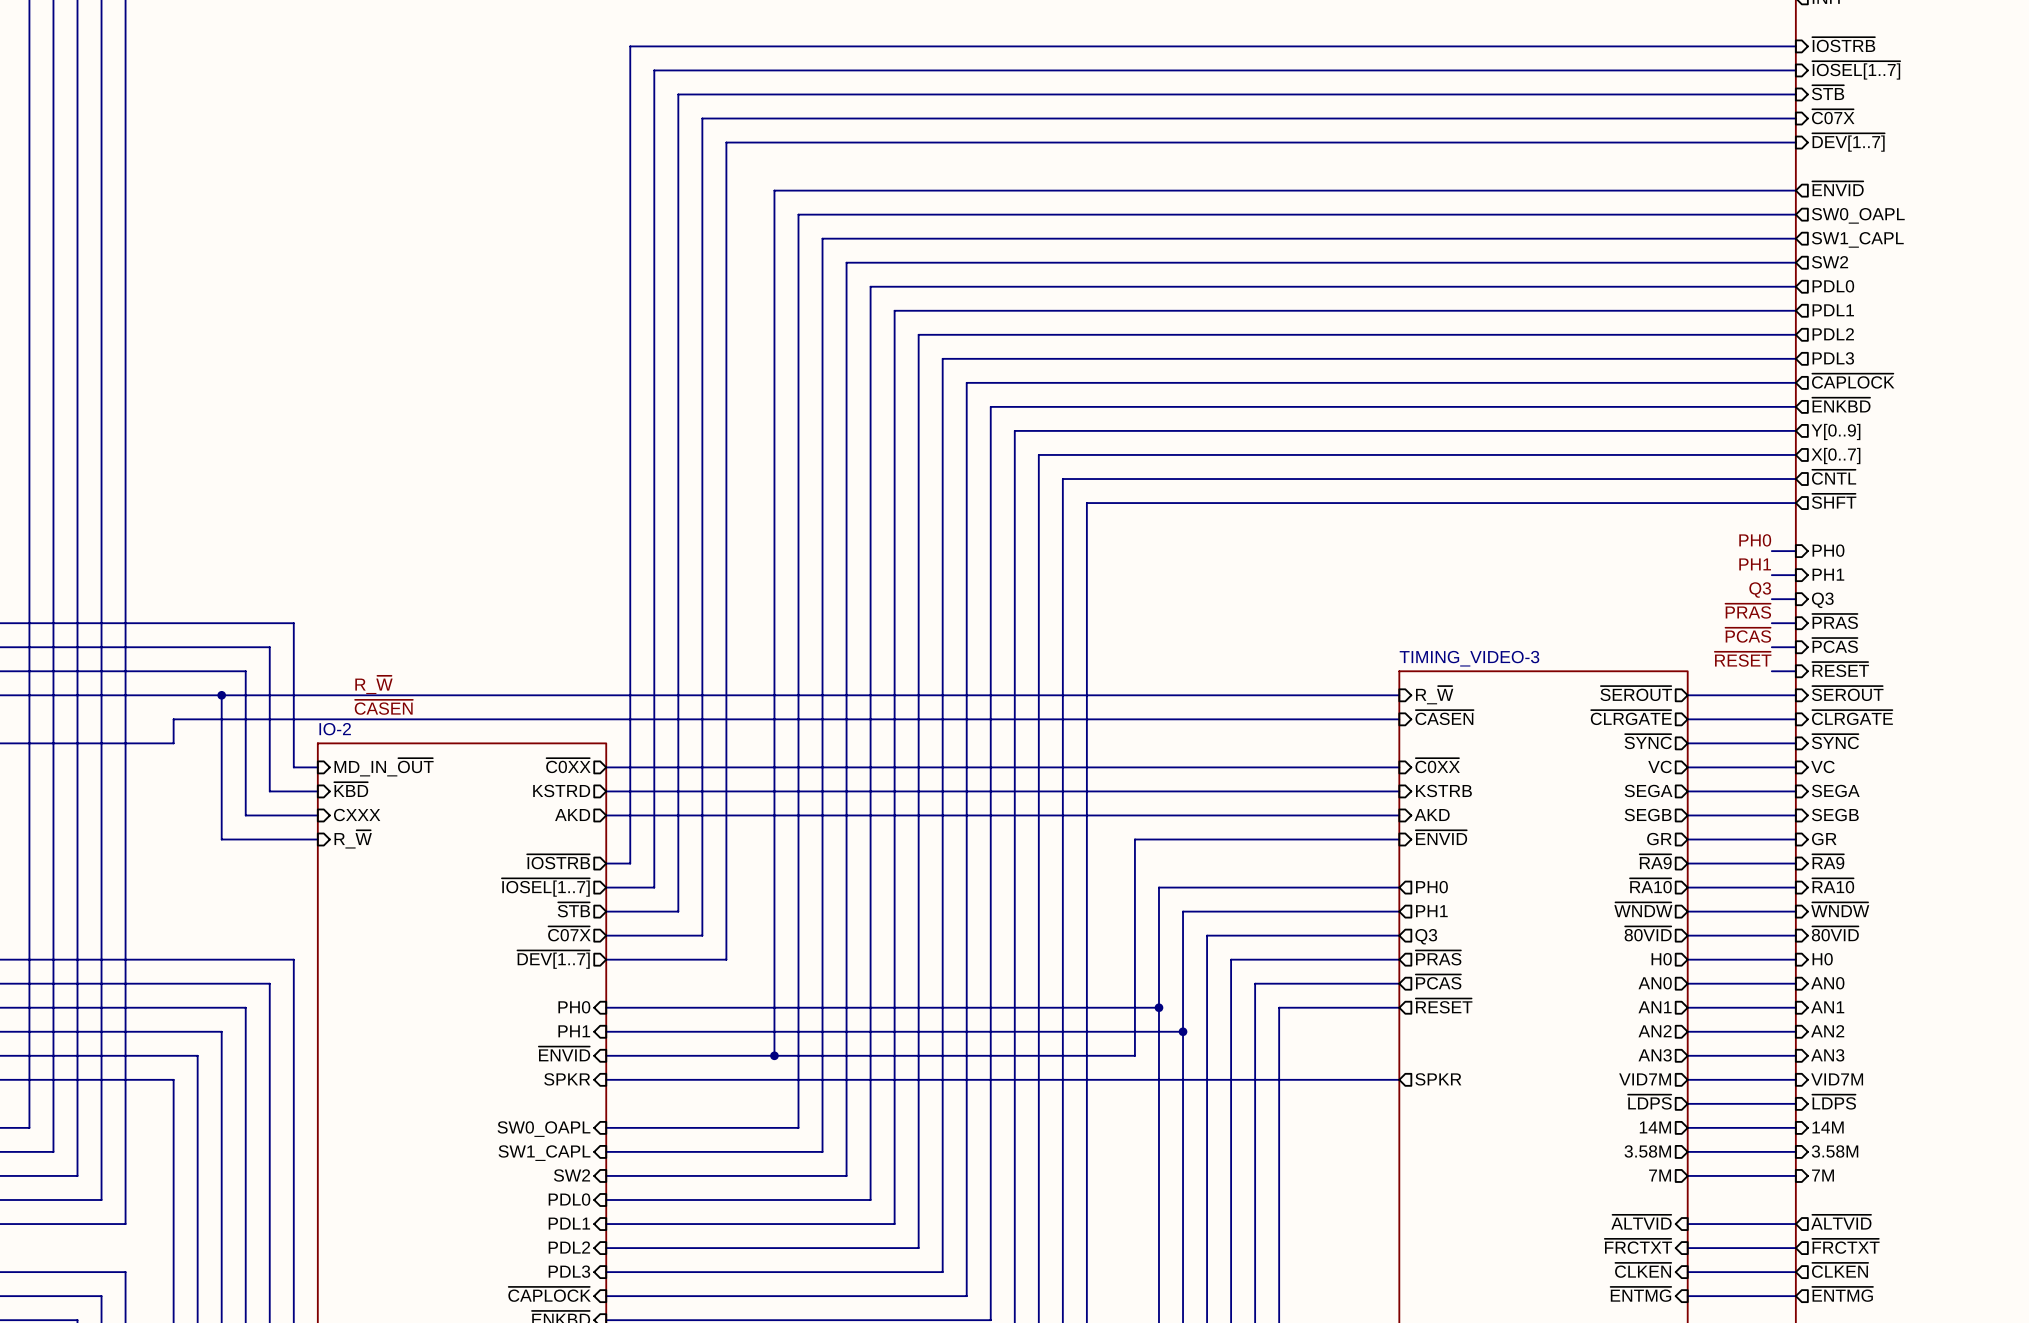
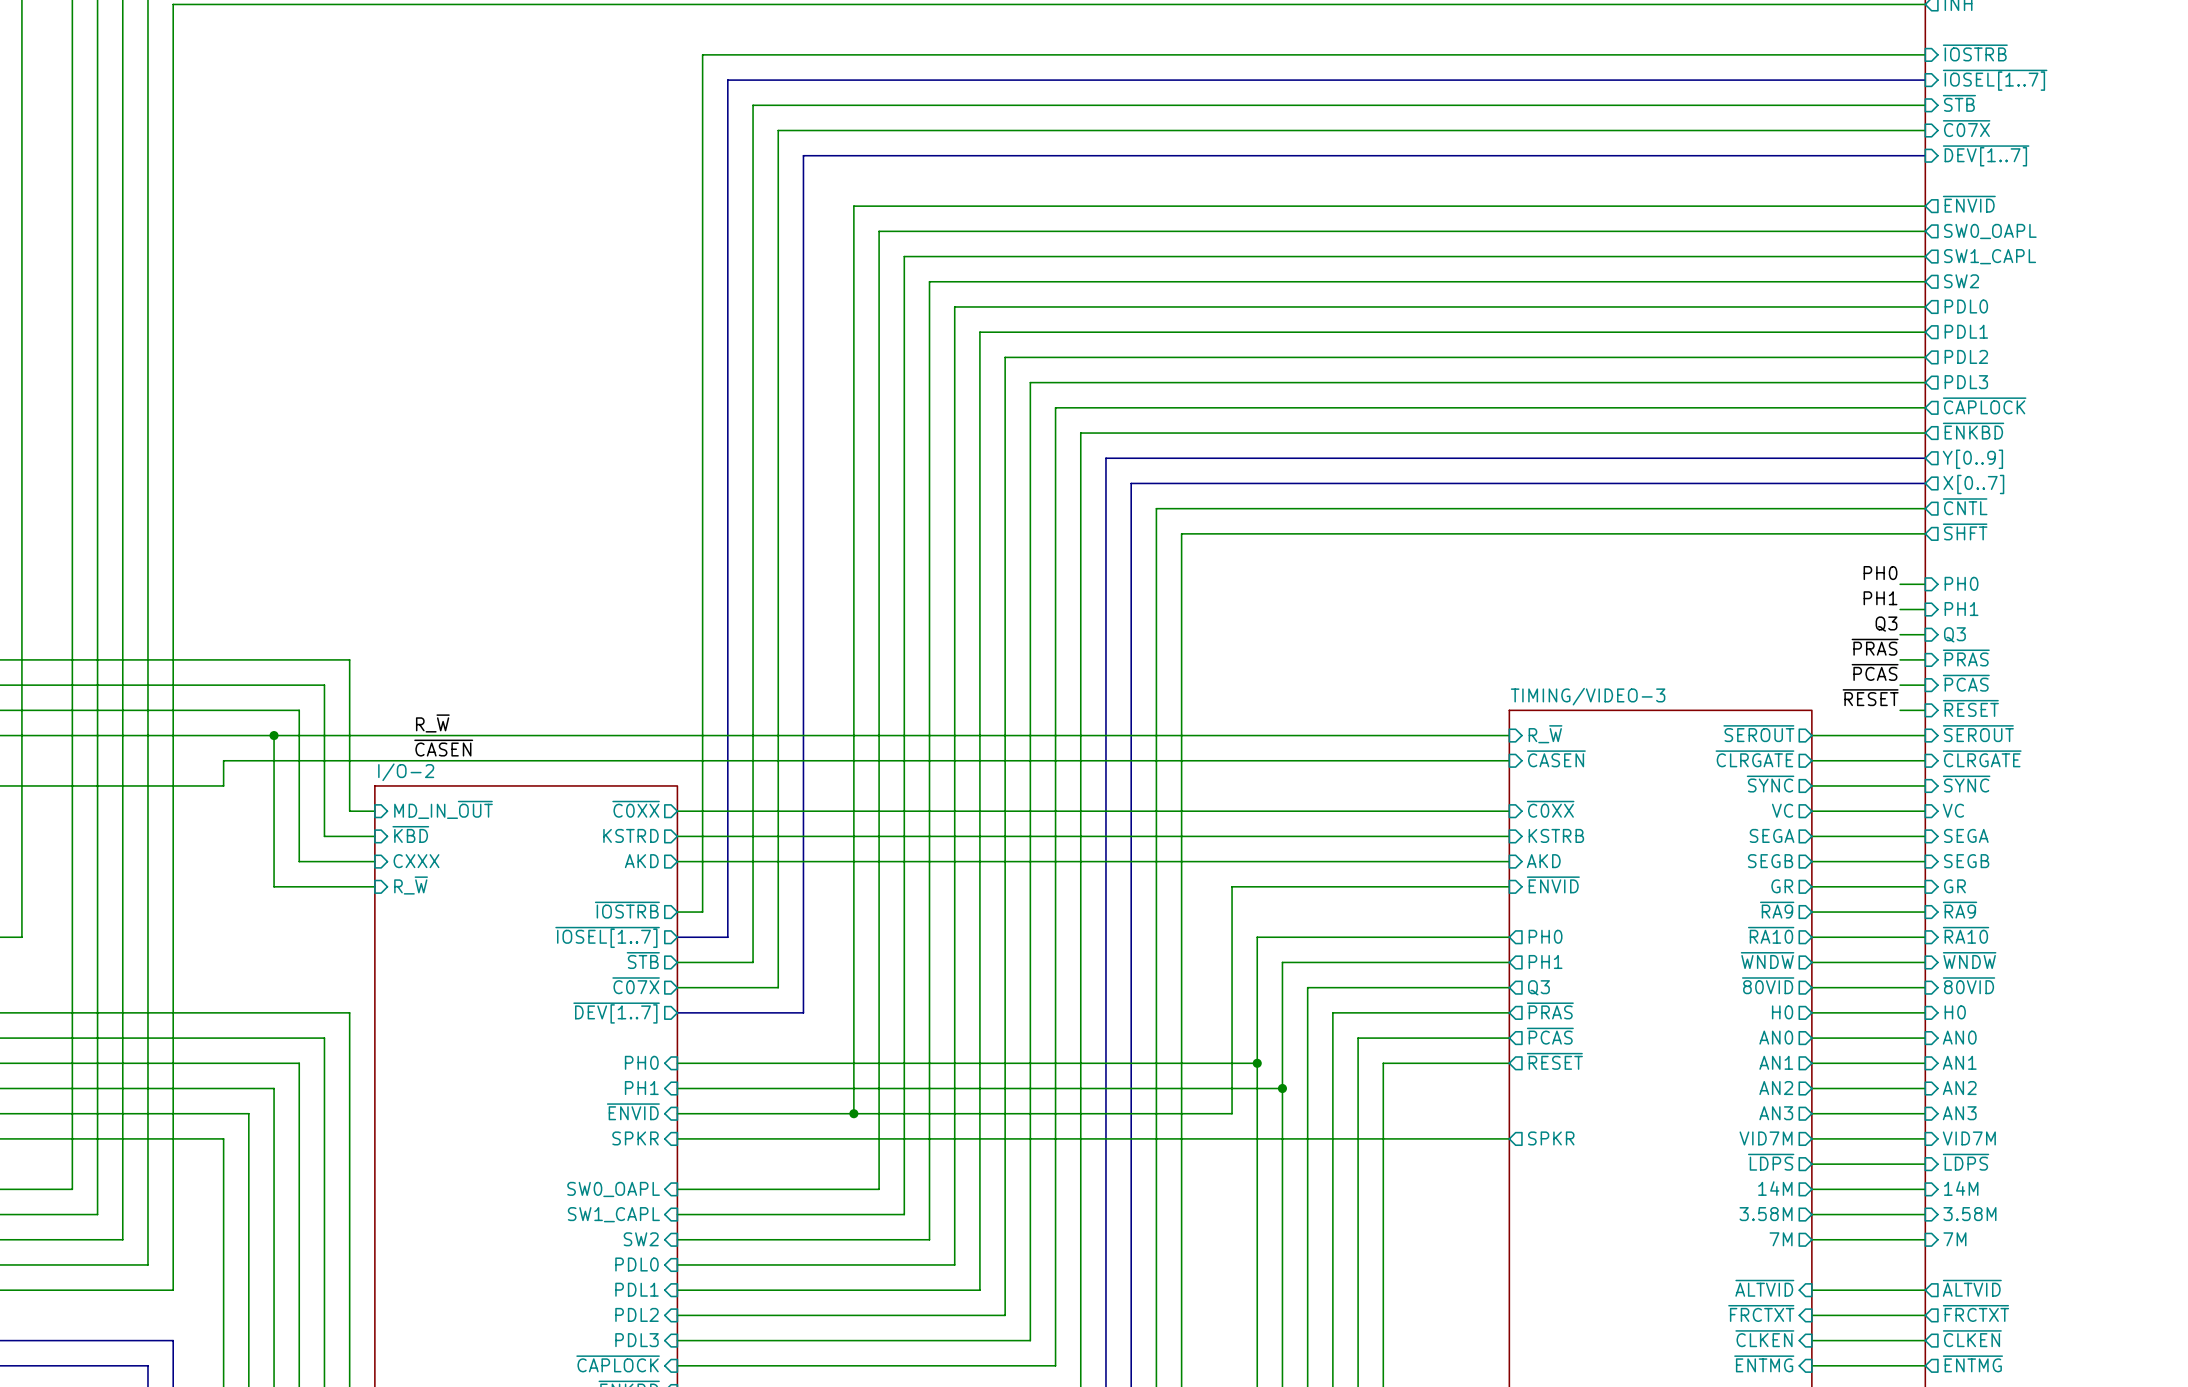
sheet TIMING_VIDEO-3 name: TIMING_VIDEO-3 (1469, 658) -> TIMING/VIDEO-3 (1588, 696)
sheet IO-2 name: IO-2 (335, 729) -> I/O-2 (406, 772)

